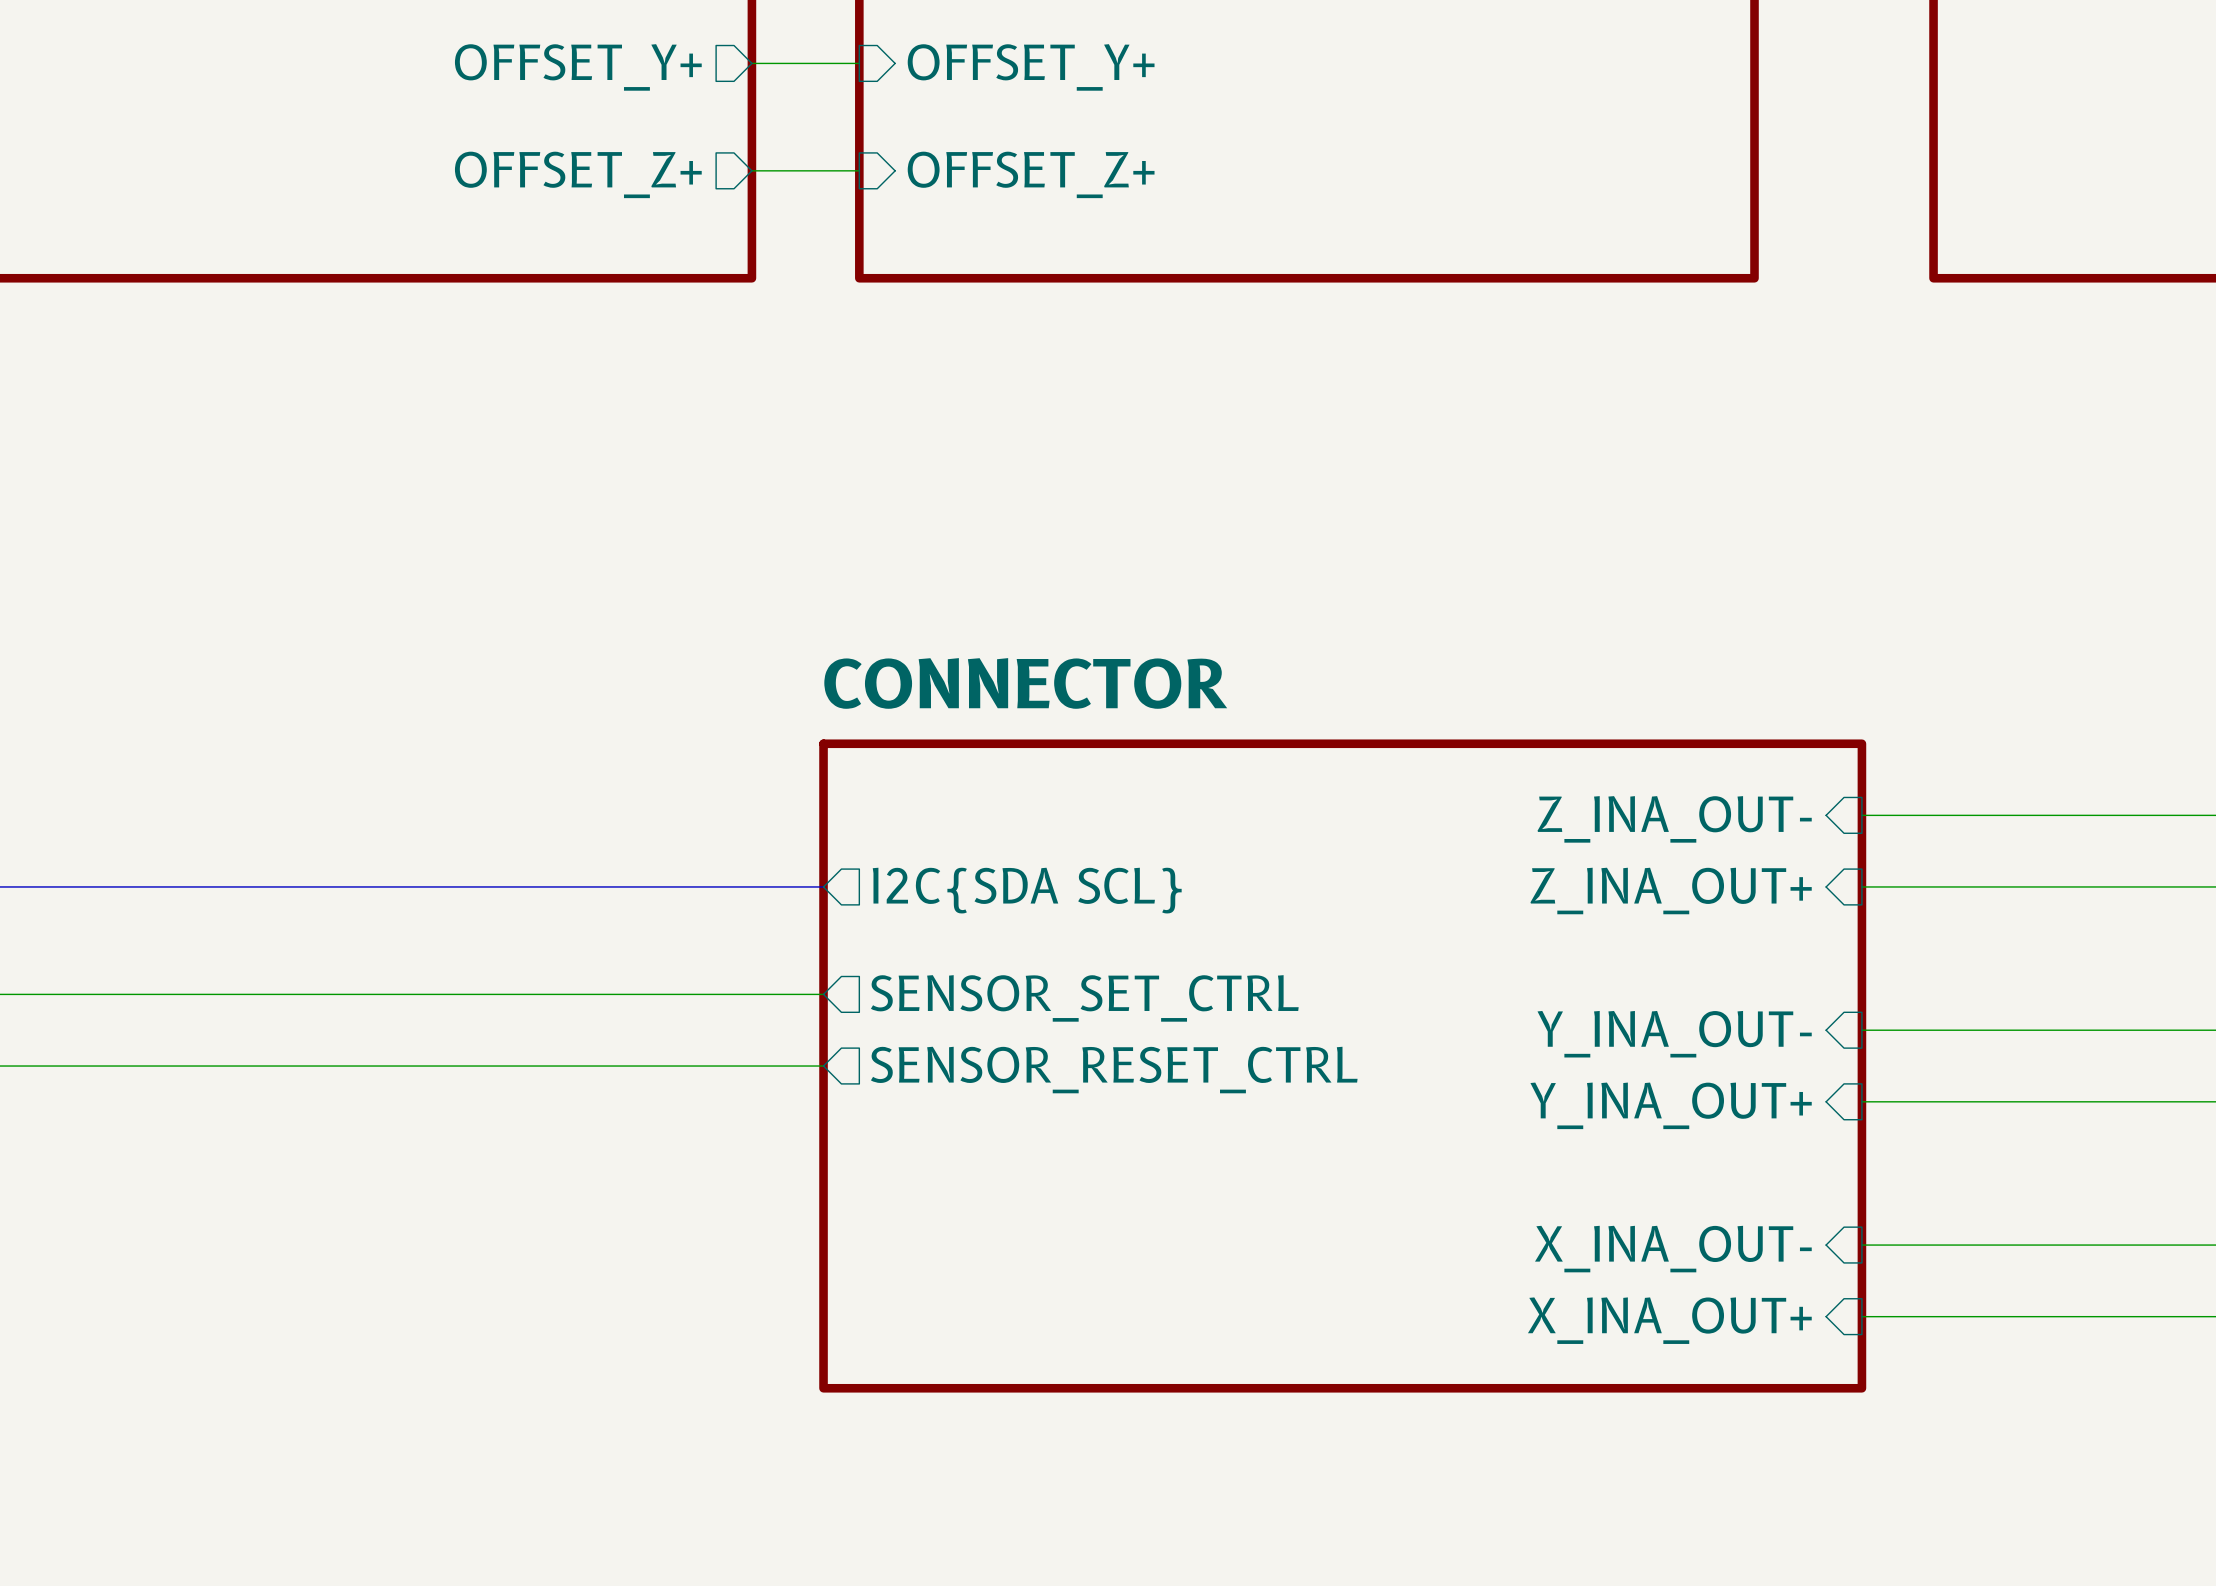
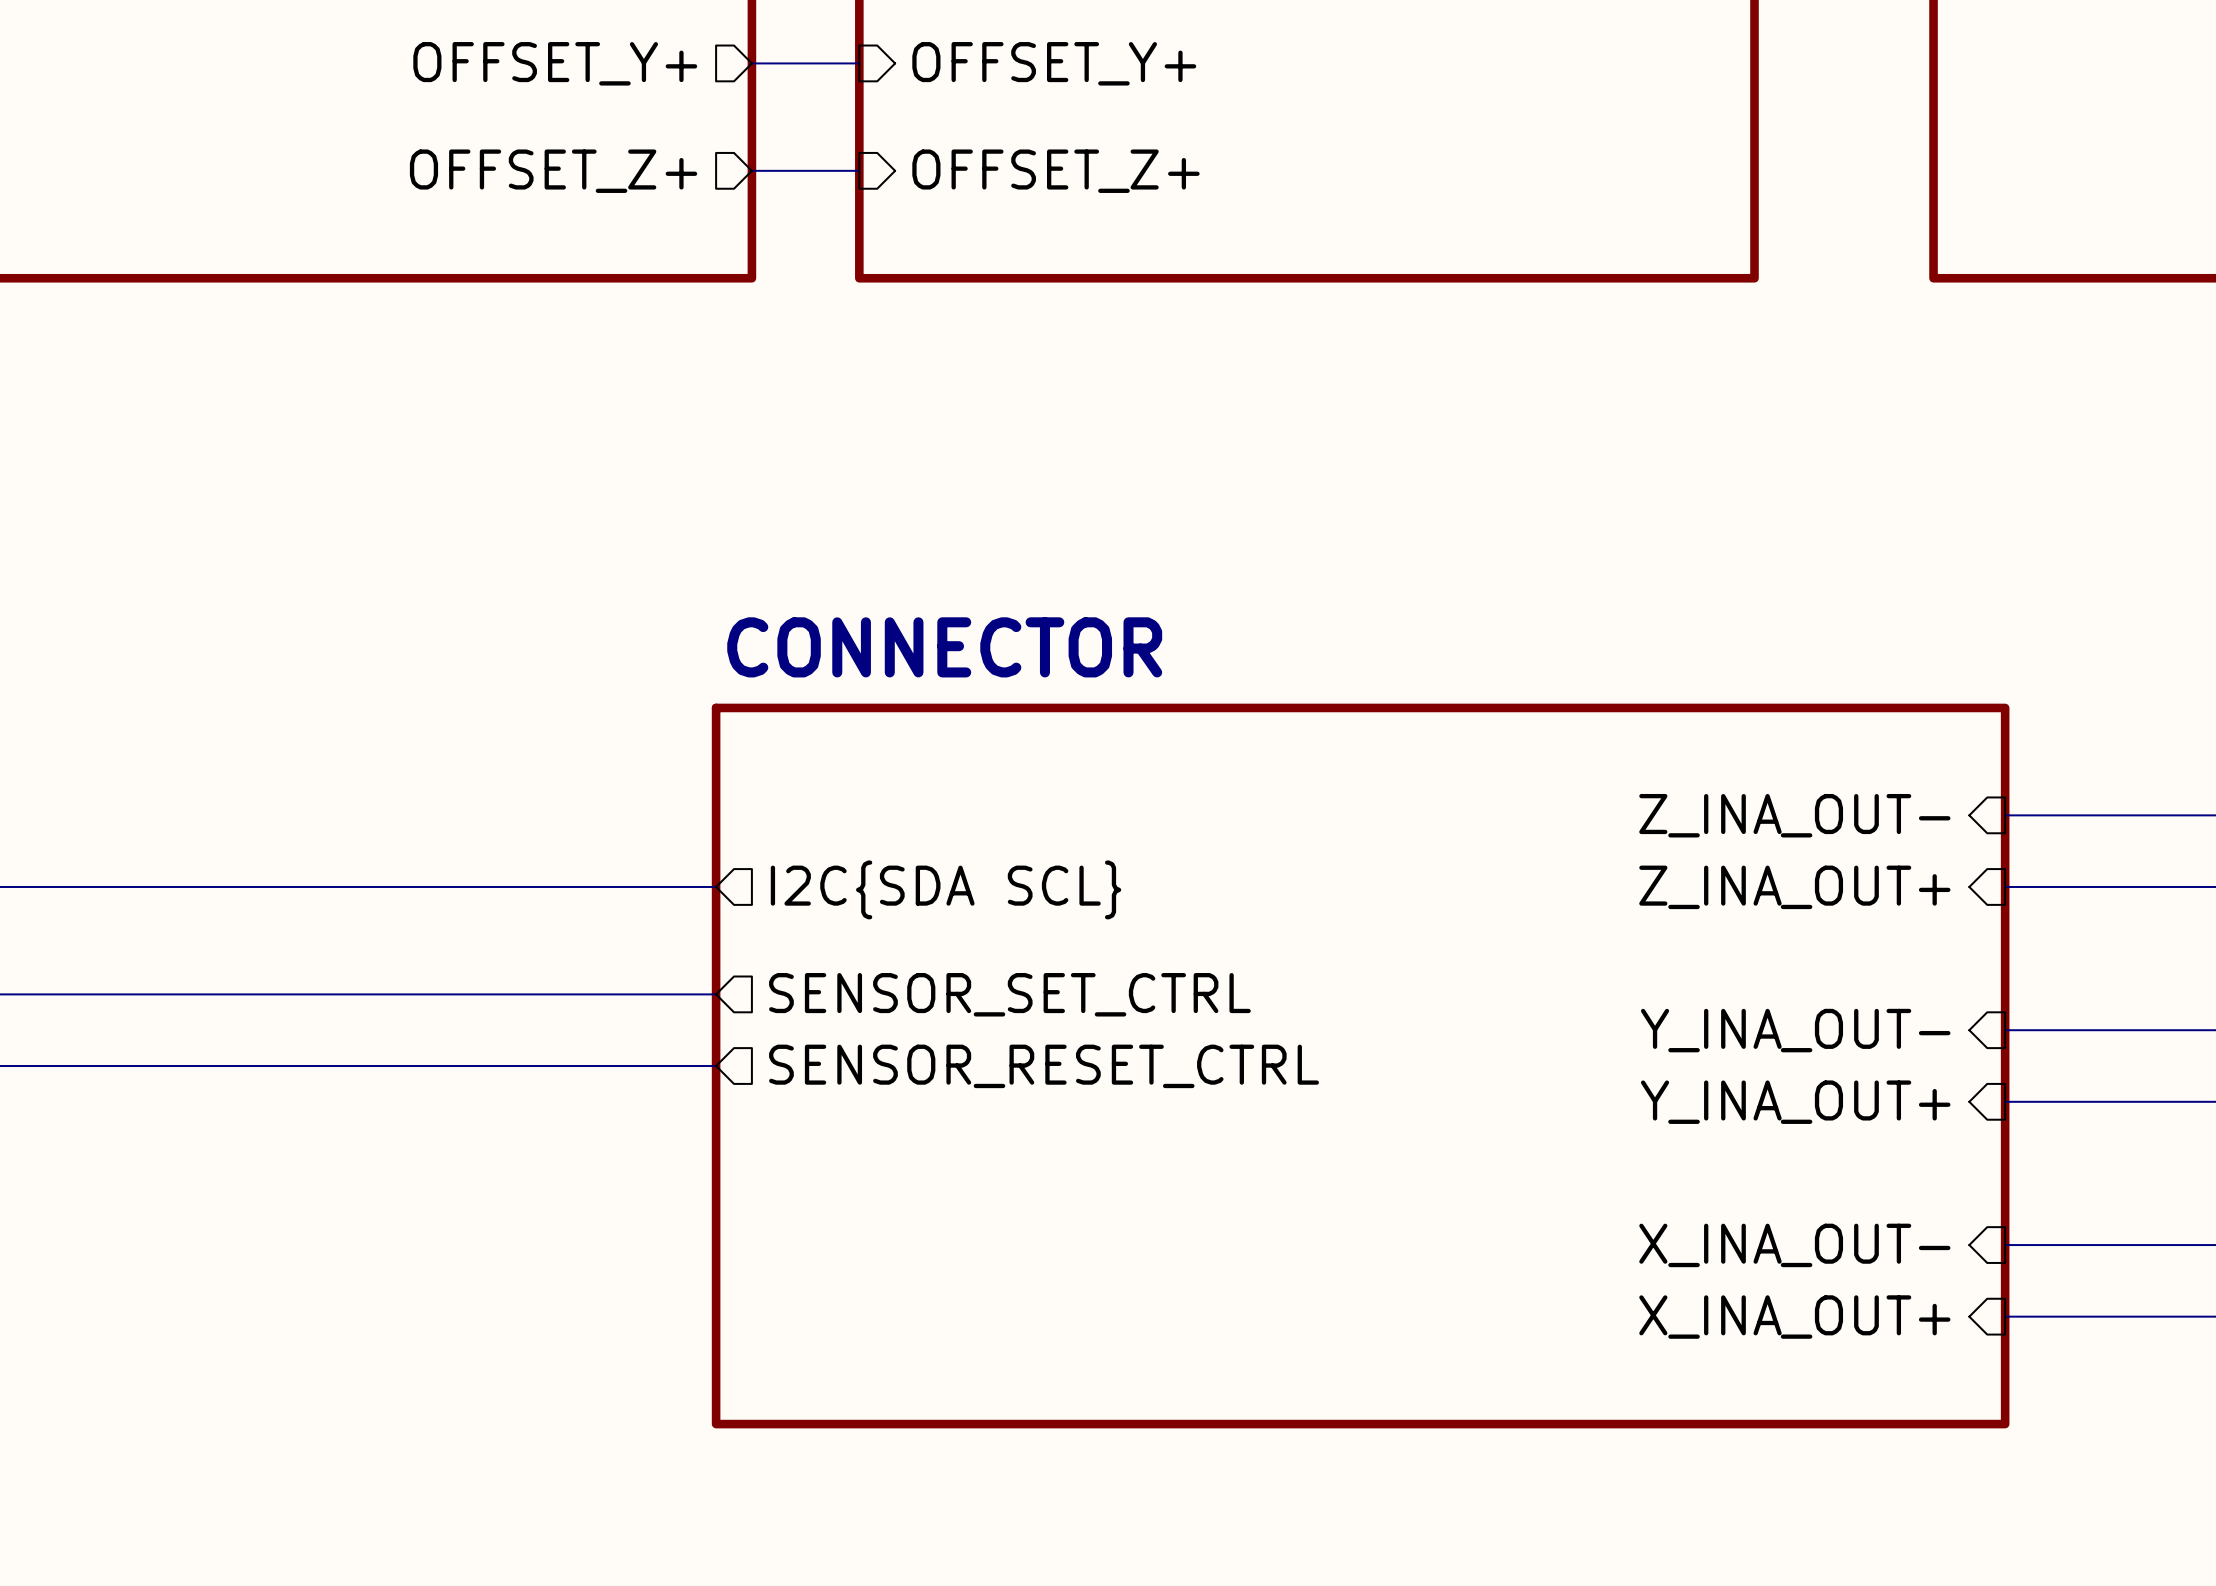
sheet CONNECTOR name position: CONNECTOR (1025, 683) -> CONNECTOR (944, 647)
sheet CONNECTOR shape: [819, 739, 1867, 1393] -> [711, 703, 2010, 1429]
wire: (1861, 815) (2005, 815) -> none
sheet pin position: Z_INA_OUT- (1674, 819) -> Z_INA_OUT- (1794, 815)
bus: (716, 886) (823, 886) -> none
wire: (1861, 886) (2005, 886) -> none
sheet pin position: I2C{SDA SCL} (1027, 890) -> I2C{SDA SCL} (945, 889)
sheet pin position: Z_INA_OUT+ (1671, 891) -> Z_INA_OUT+ (1794, 887)
wire: (716, 994) (823, 994) -> none
sheet pin position: SENSOR_SET_CTRL (1084, 998) -> SENSOR_SET_CTRL (1009, 994)
wire: (1861, 1030) (2005, 1030) -> none
sheet pin position: Y_INA_OUT- (1674, 1034) -> Y_INA_OUT- (1795, 1030)
wire: (716, 1066) (823, 1066) -> none
sheet pin position: SENSOR_RESET_CTRL (1114, 1070) -> SENSOR_RESET_CTRL (1044, 1066)
wire: (1861, 1101) (2005, 1101) -> none
sheet pin position: Y_INA_OUT+ (1671, 1105) -> Y_INA_OUT+ (1795, 1102)
wire: (1861, 1245) (2005, 1245) -> none
sheet pin position: X_INA_OUT- (1673, 1249) -> X_INA_OUT- (1794, 1245)
wire: (1861, 1316) (2005, 1316) -> none
sheet pin position: X_INA_OUT+ (1669, 1320) -> X_INA_OUT+ (1794, 1317)

